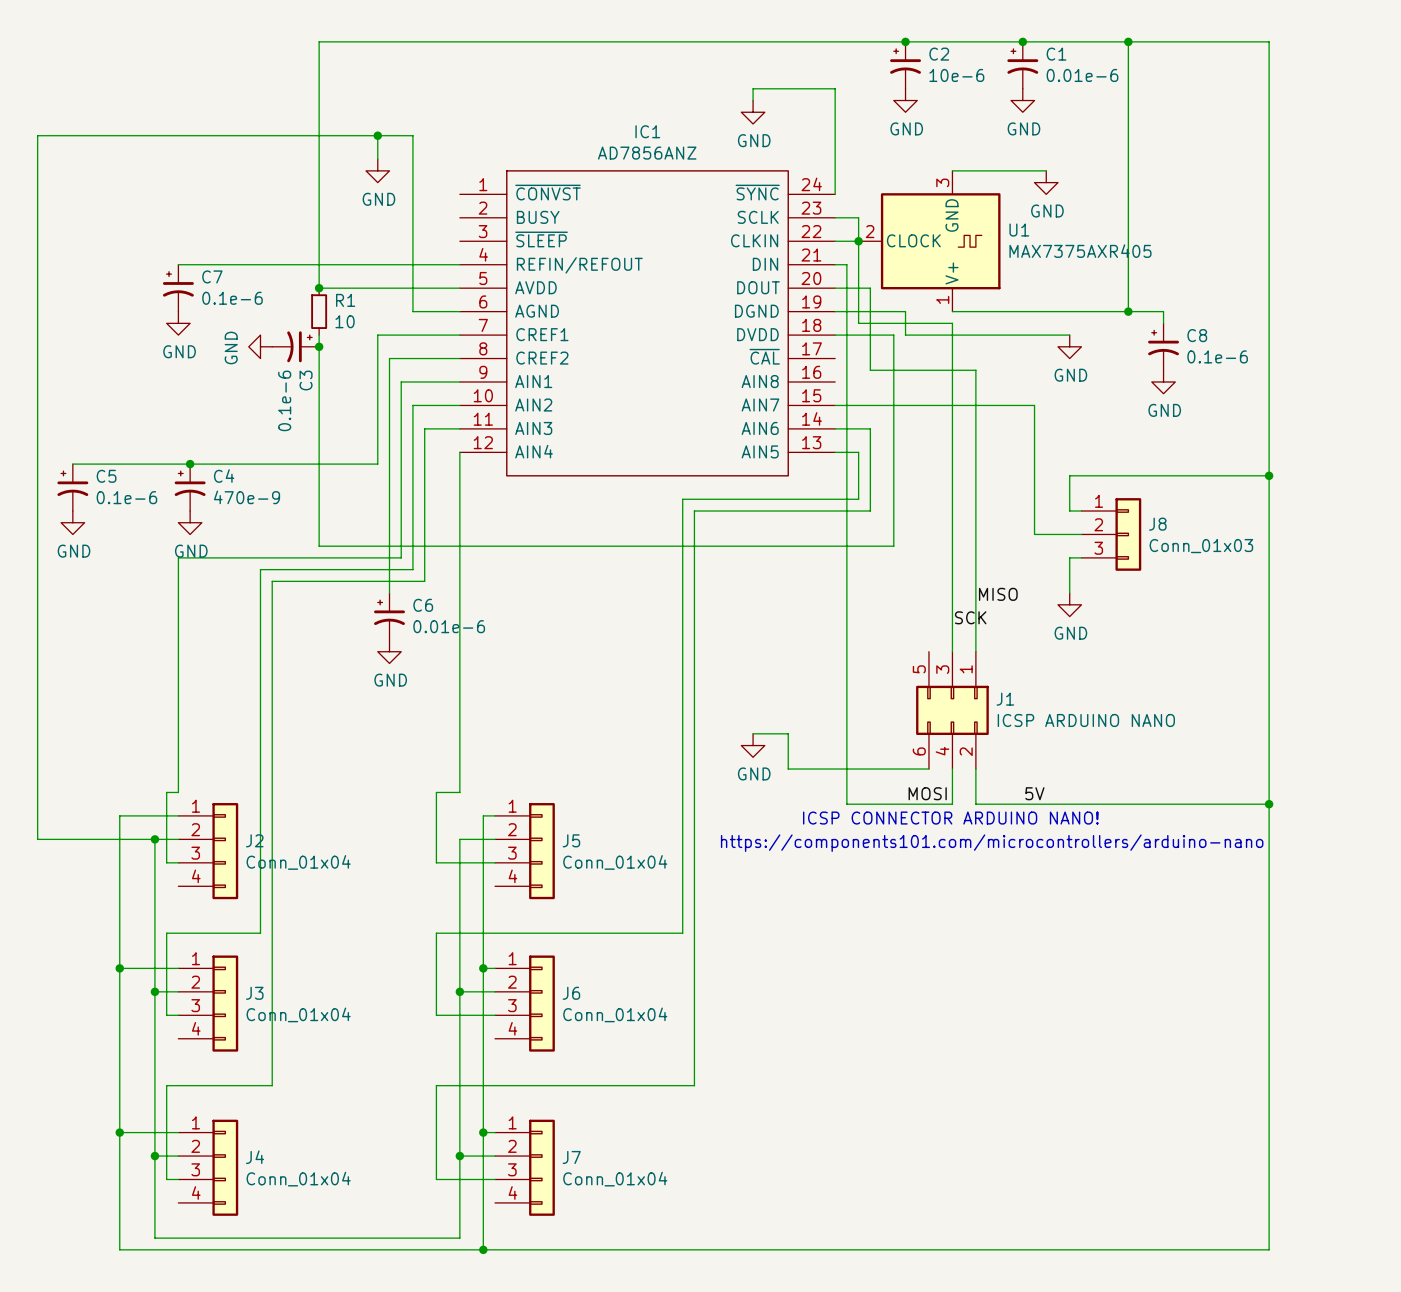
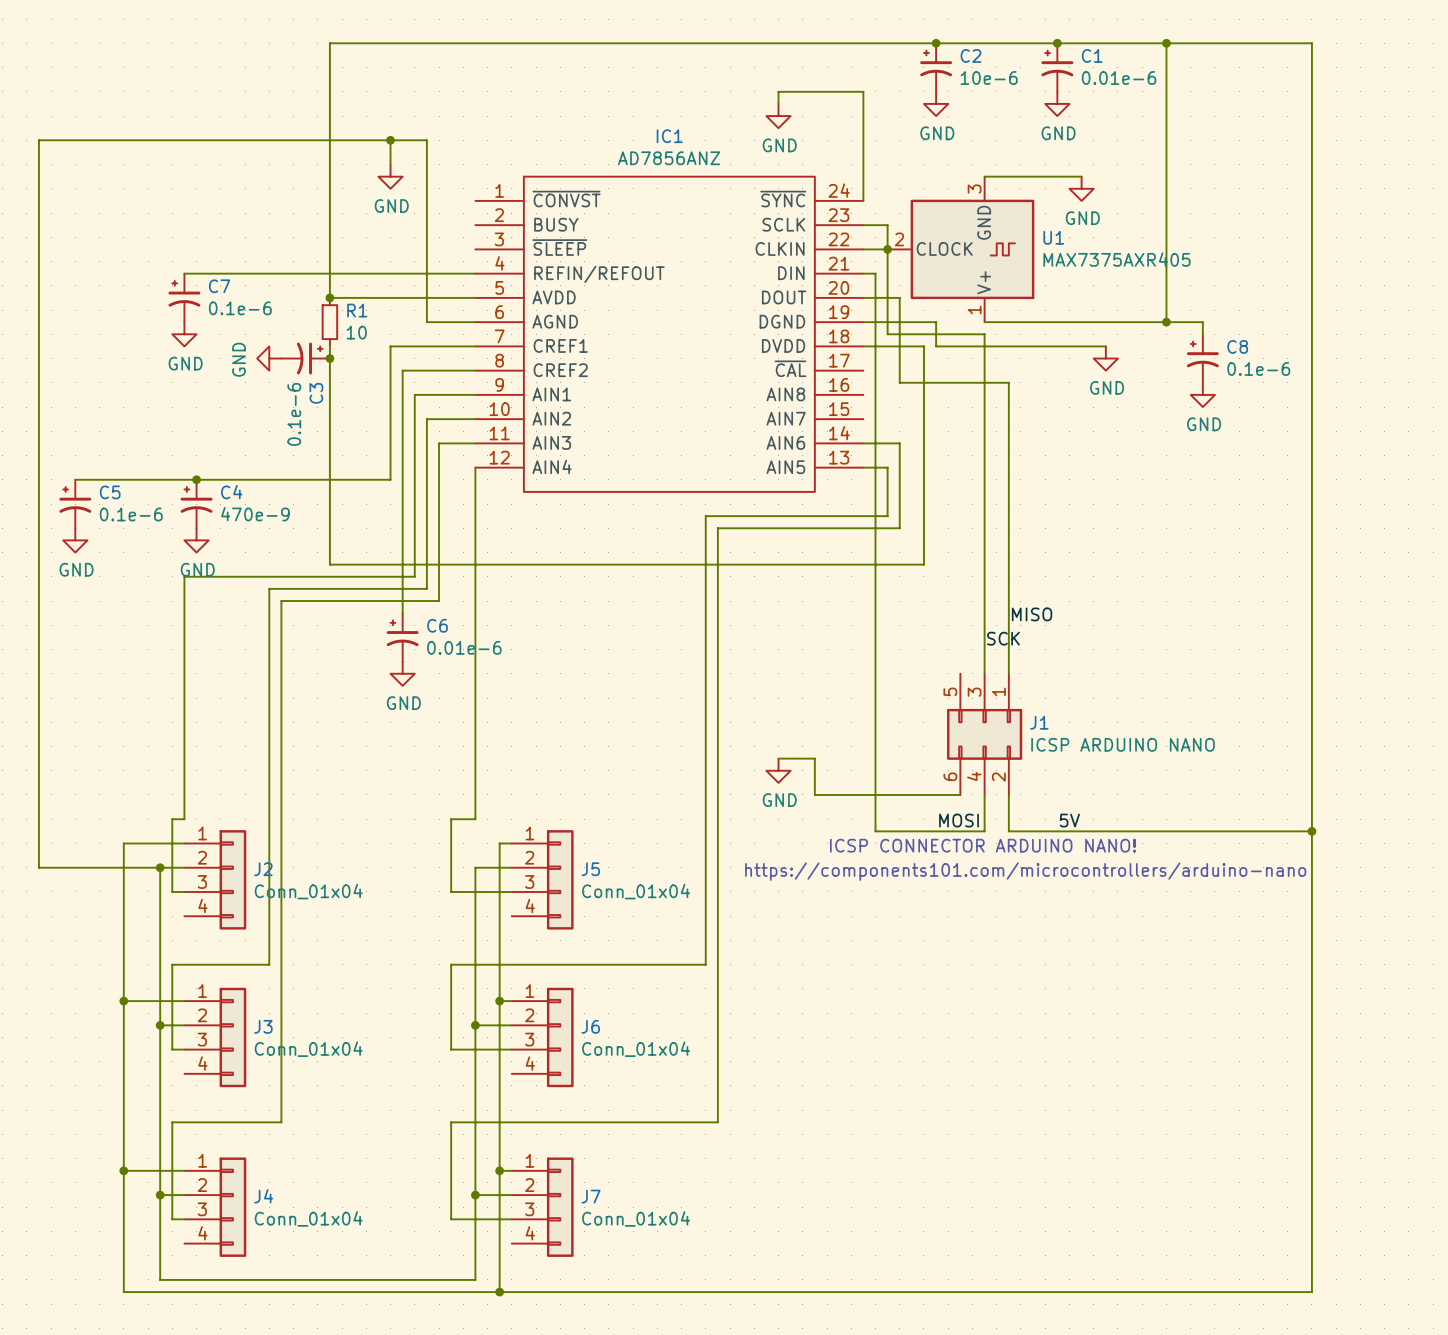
wire: (835, 405) (1034, 405) (1034, 534) (1081, 534) -> none
wire: (1269, 475) (1069, 475) (1069, 511) (1081, 511) -> none
junction: (1269, 475) -> none
J8: Conn_01x03 (1111, 534) -> none
wire: (1081, 557) (1069, 557) (1069, 593) -> none
power symbol: GND (1069, 604) -> none

